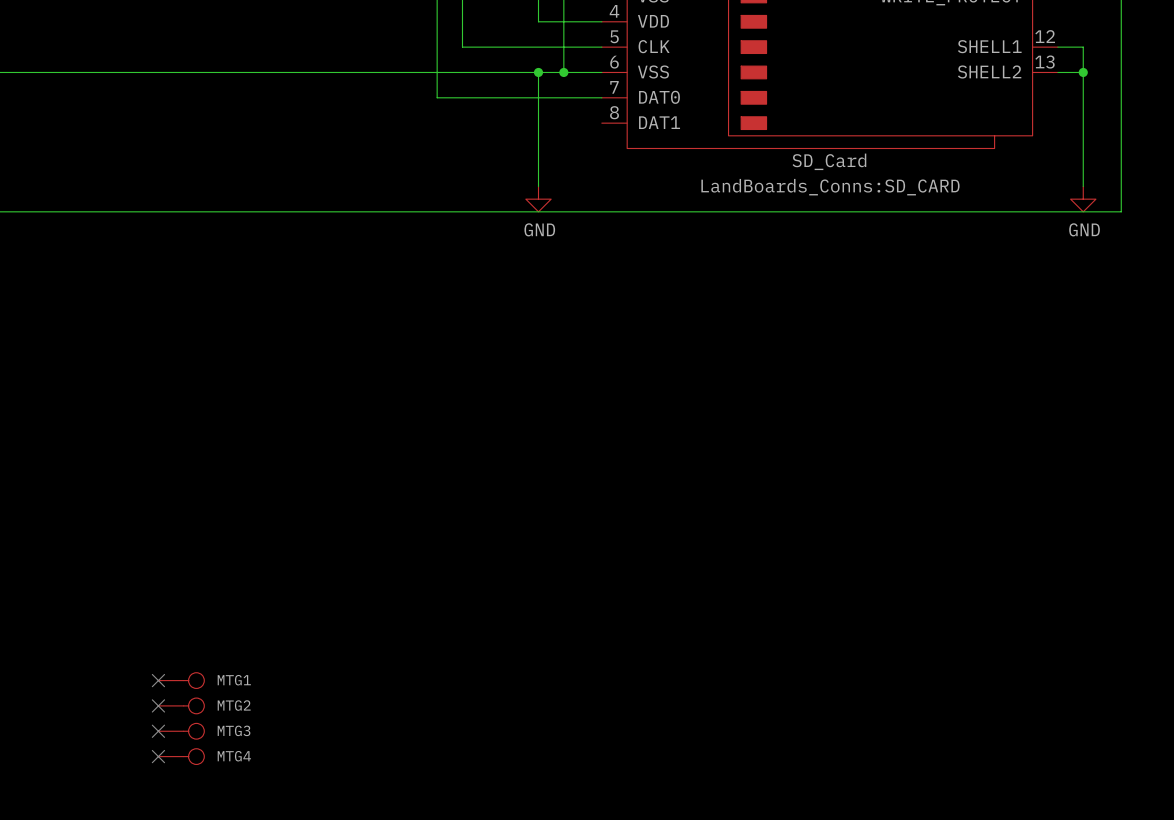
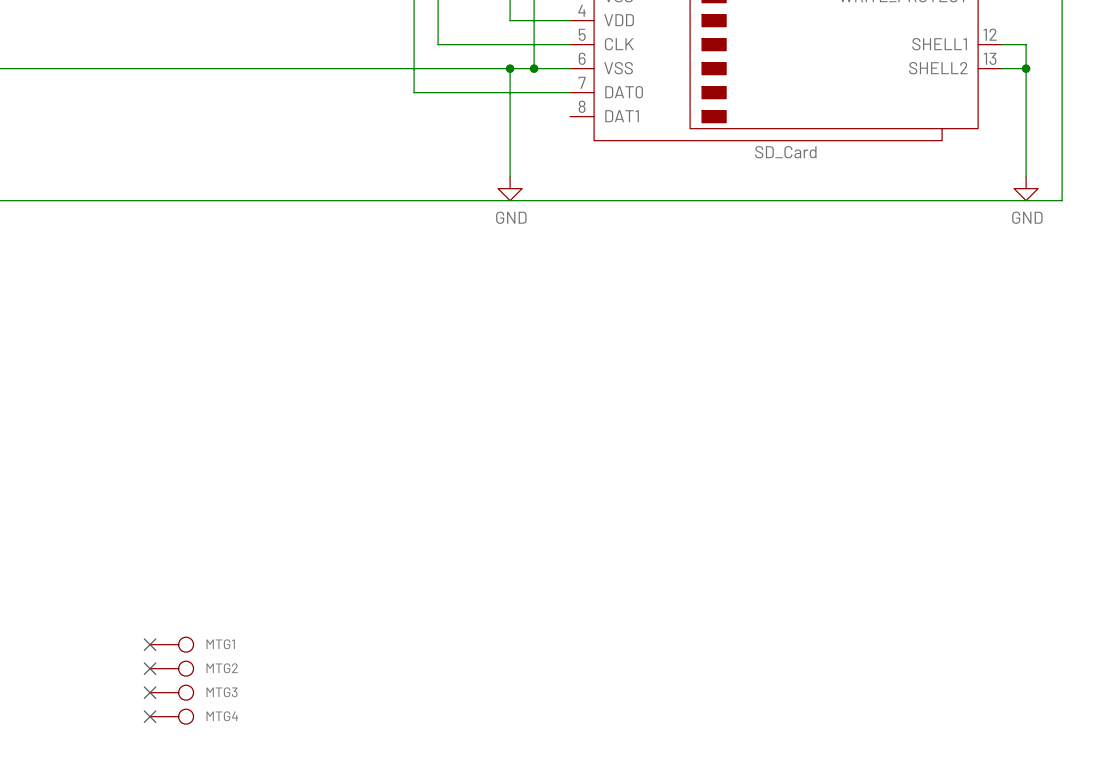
part text: LandBoards_Conns:SD_CARD (830, 187) -> none

